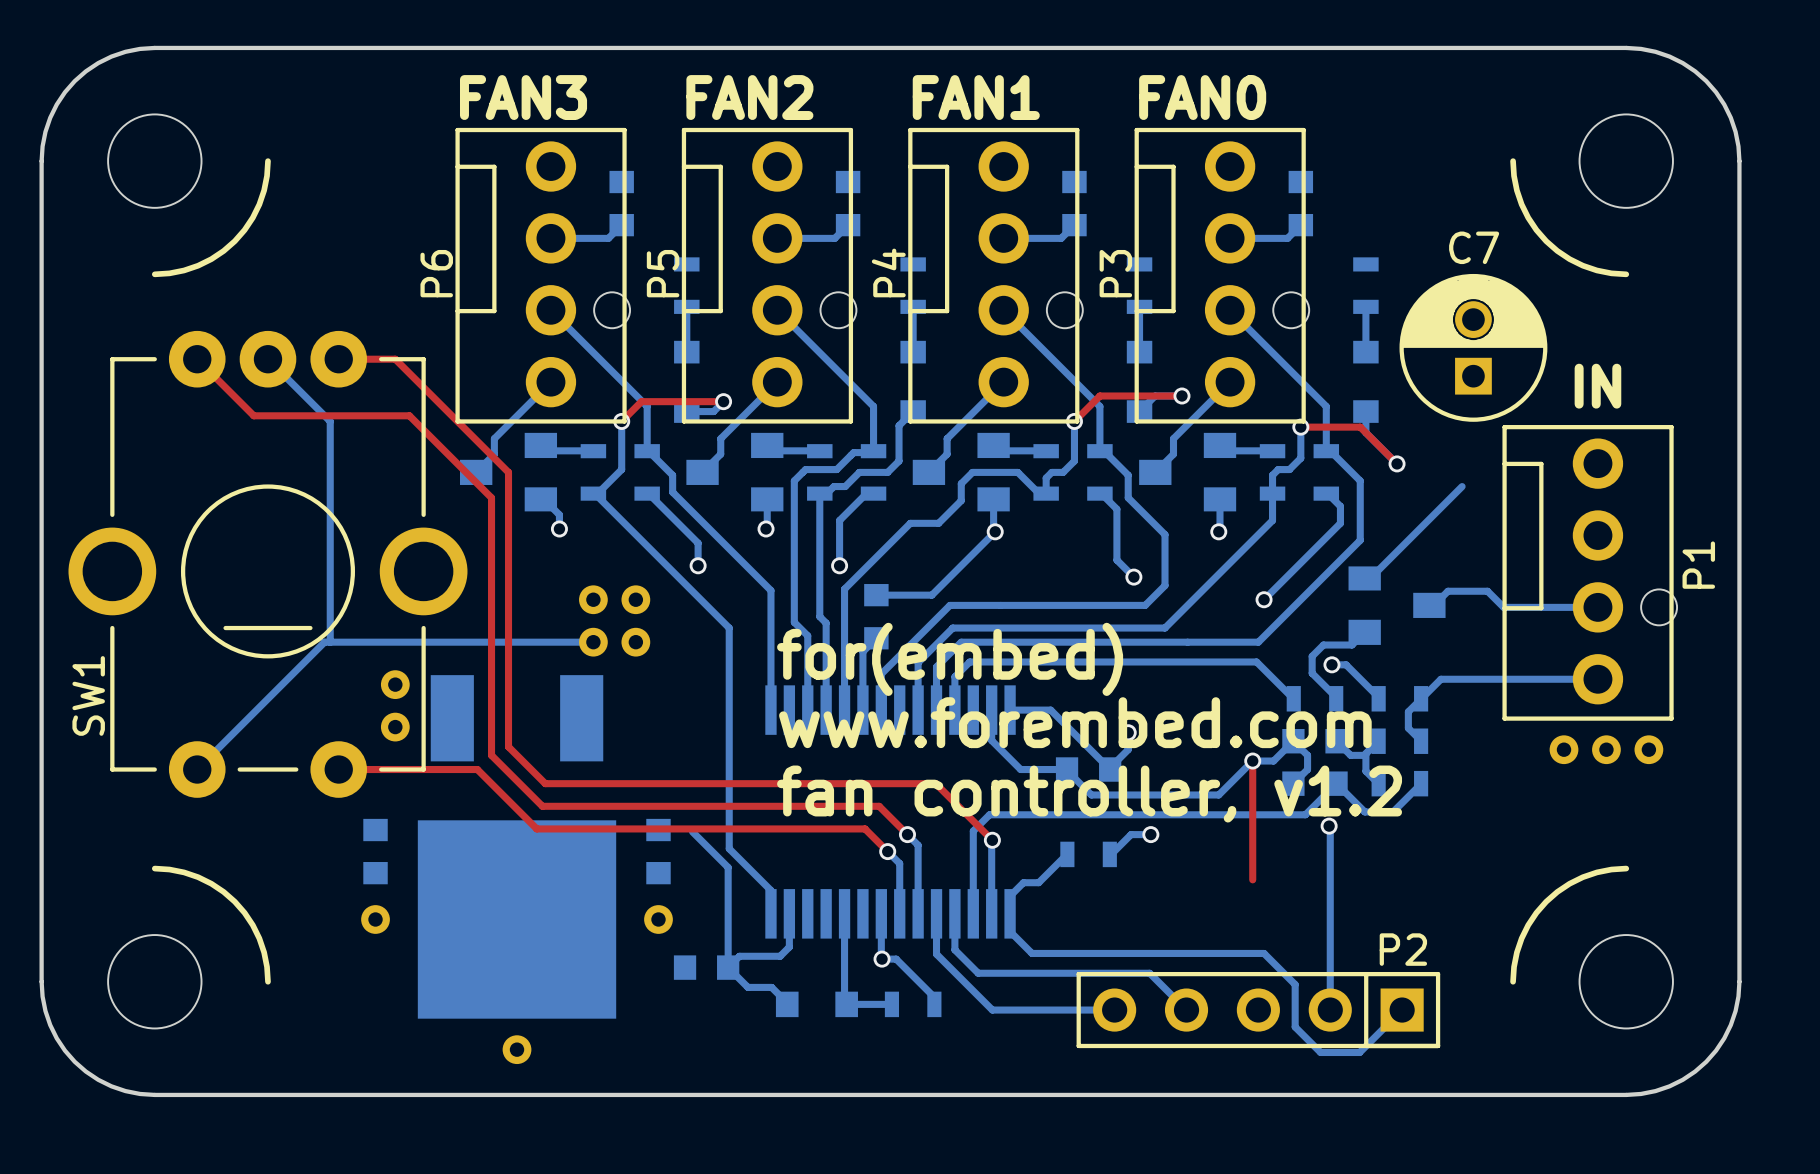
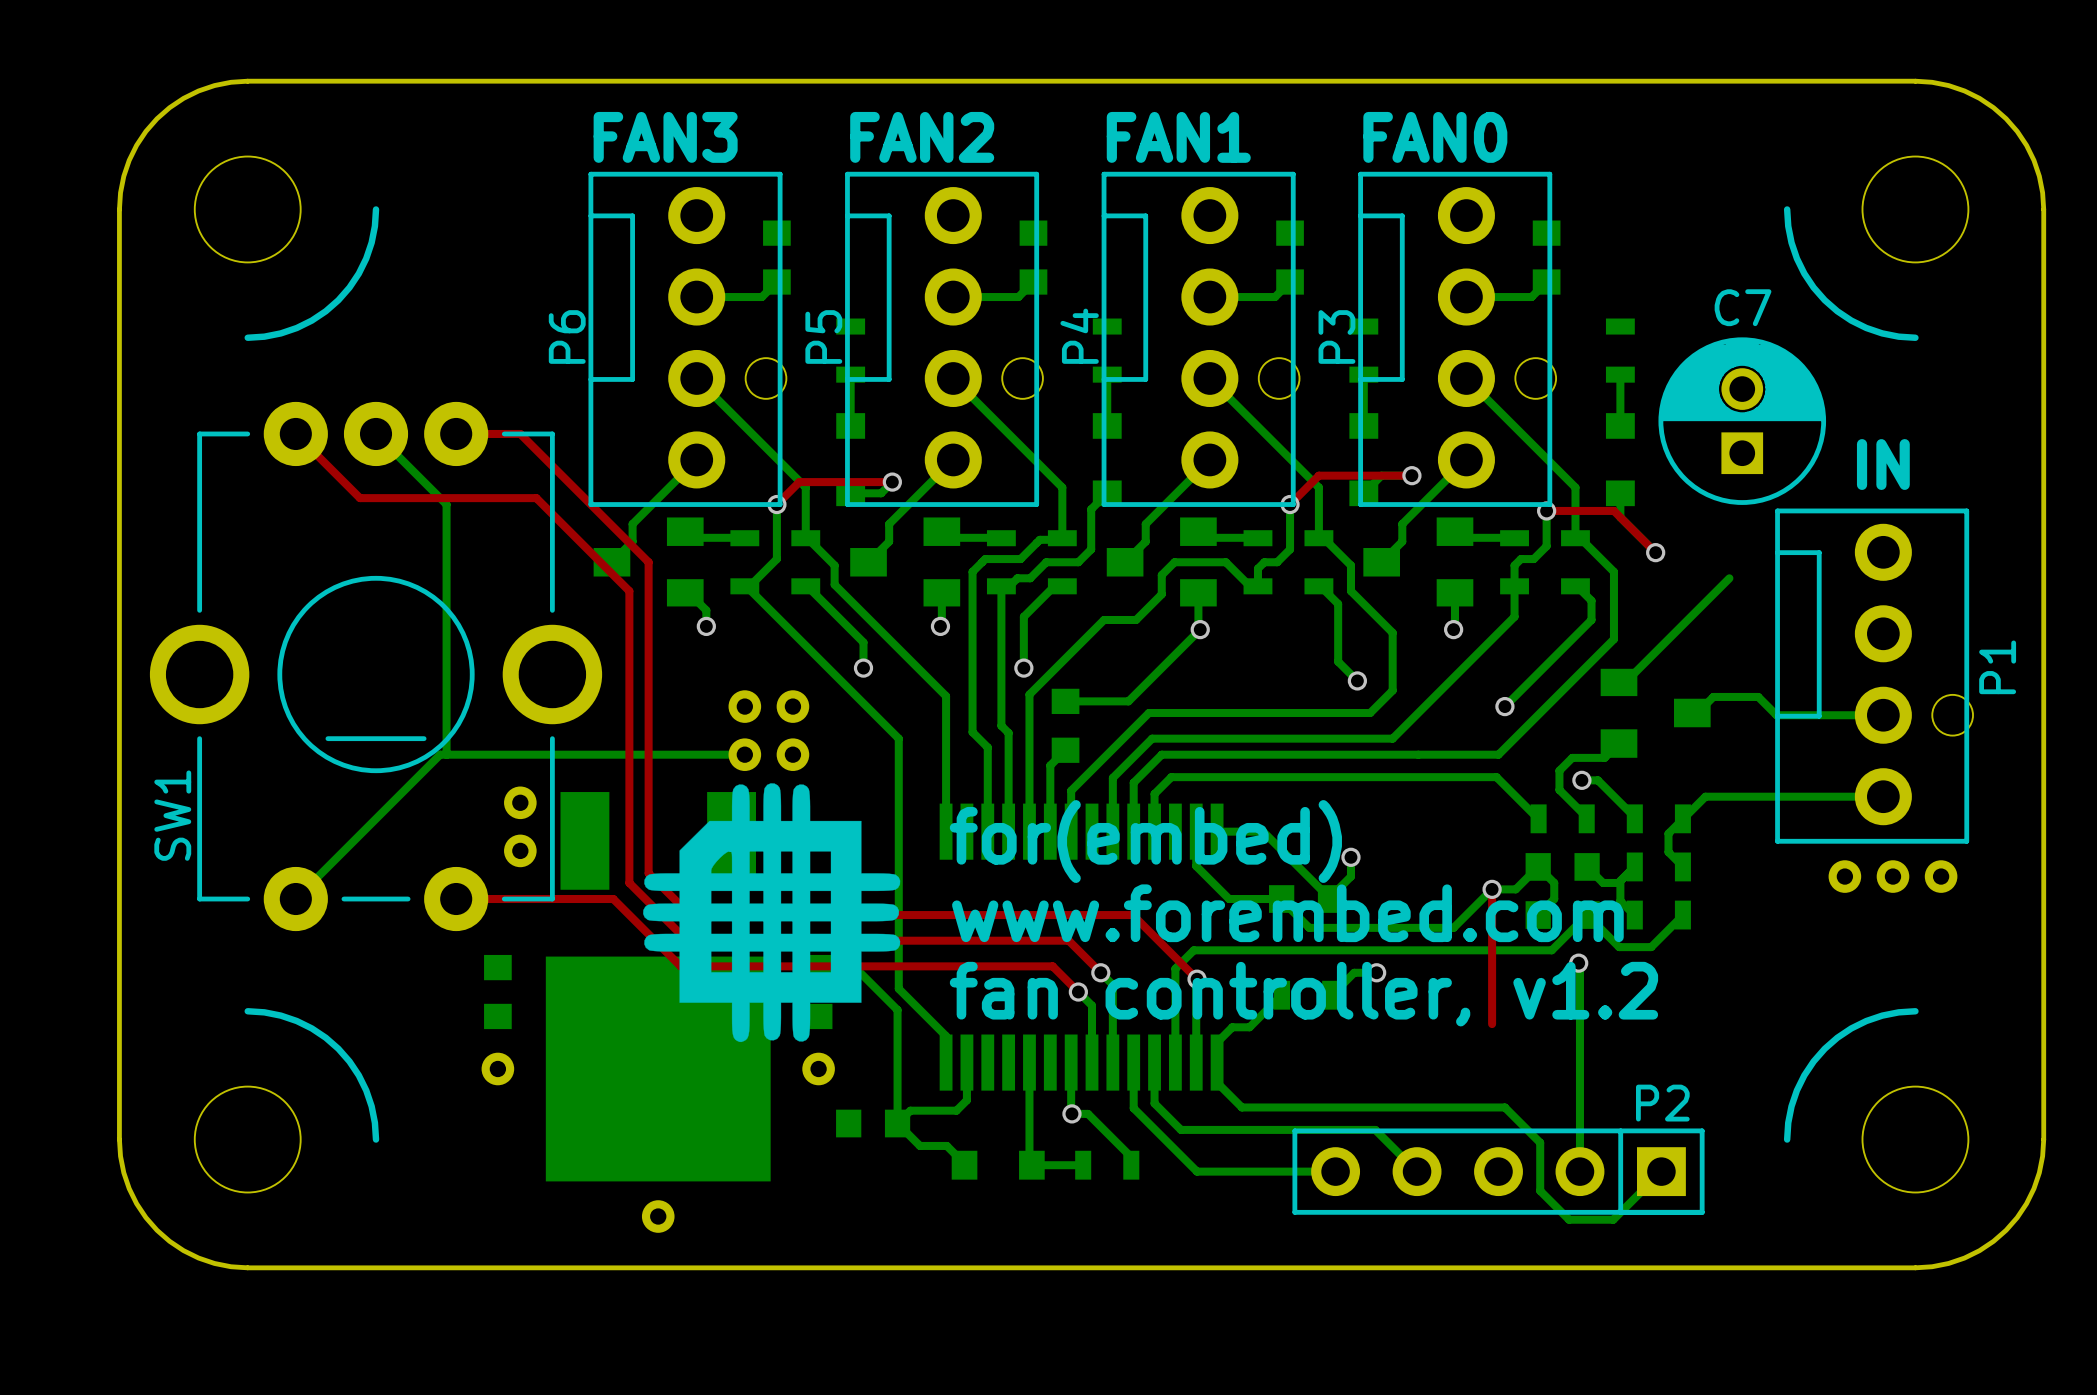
text: for(embed) (950, 659) -> none
drawing: none -> [643, 783, 901, 1043]
text: www.forembed.com (1075, 722) -> for(embed) (1145, 841)
text: fan controller, v1.2 (1089, 794) -> www.forembed.com (1287, 913)
text: none -> fan controller, v1.2 (1303, 994)

